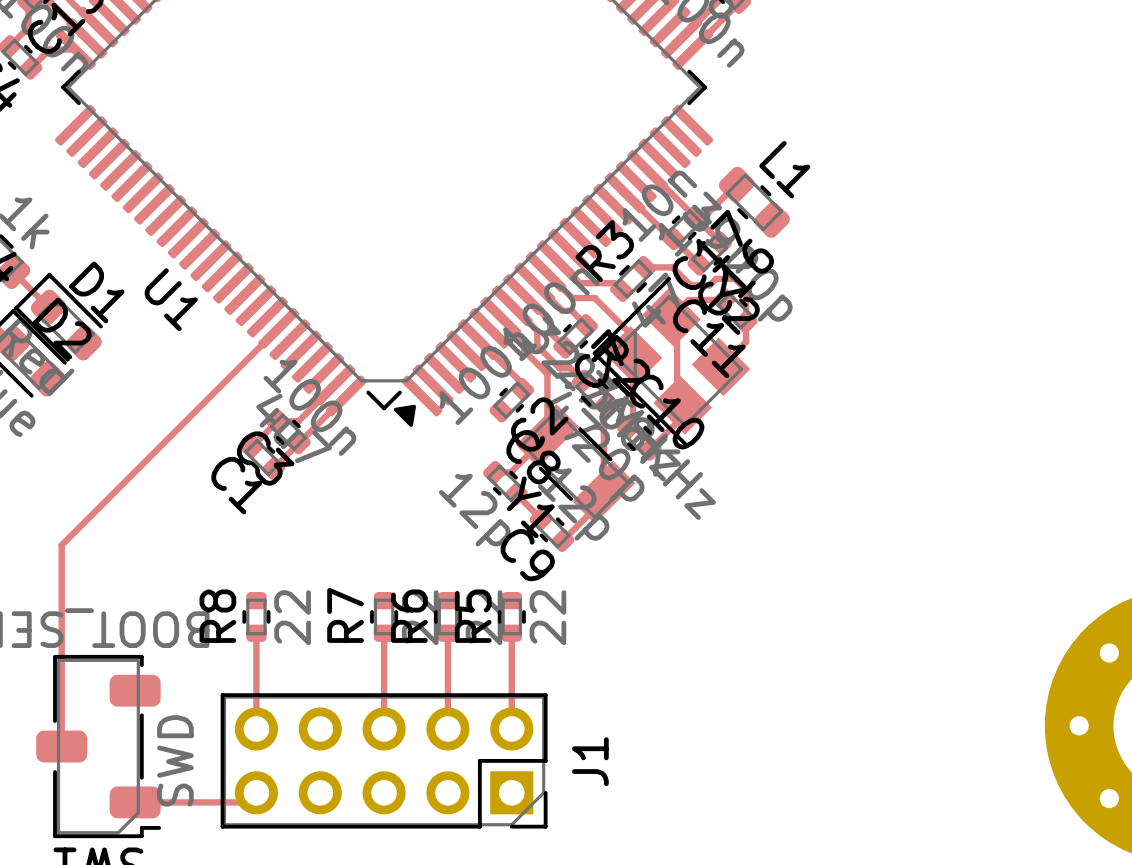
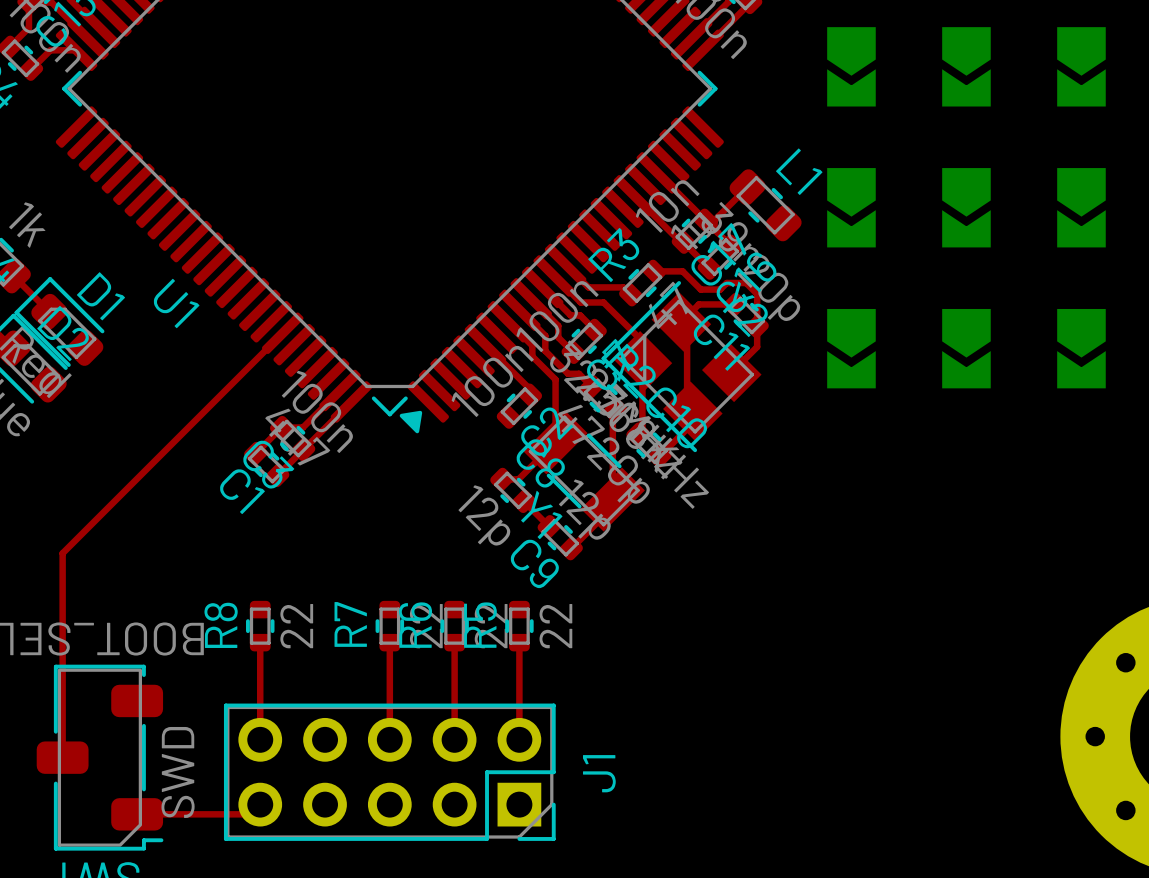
part: none -> (851, 66)
part: none -> (966, 66)
part: none -> (1081, 66)
part: none -> (851, 207)
part: none -> (966, 207)
part: none -> (1081, 207)
part: none -> (851, 348)
part: none -> (966, 348)
part: none -> (1081, 348)

